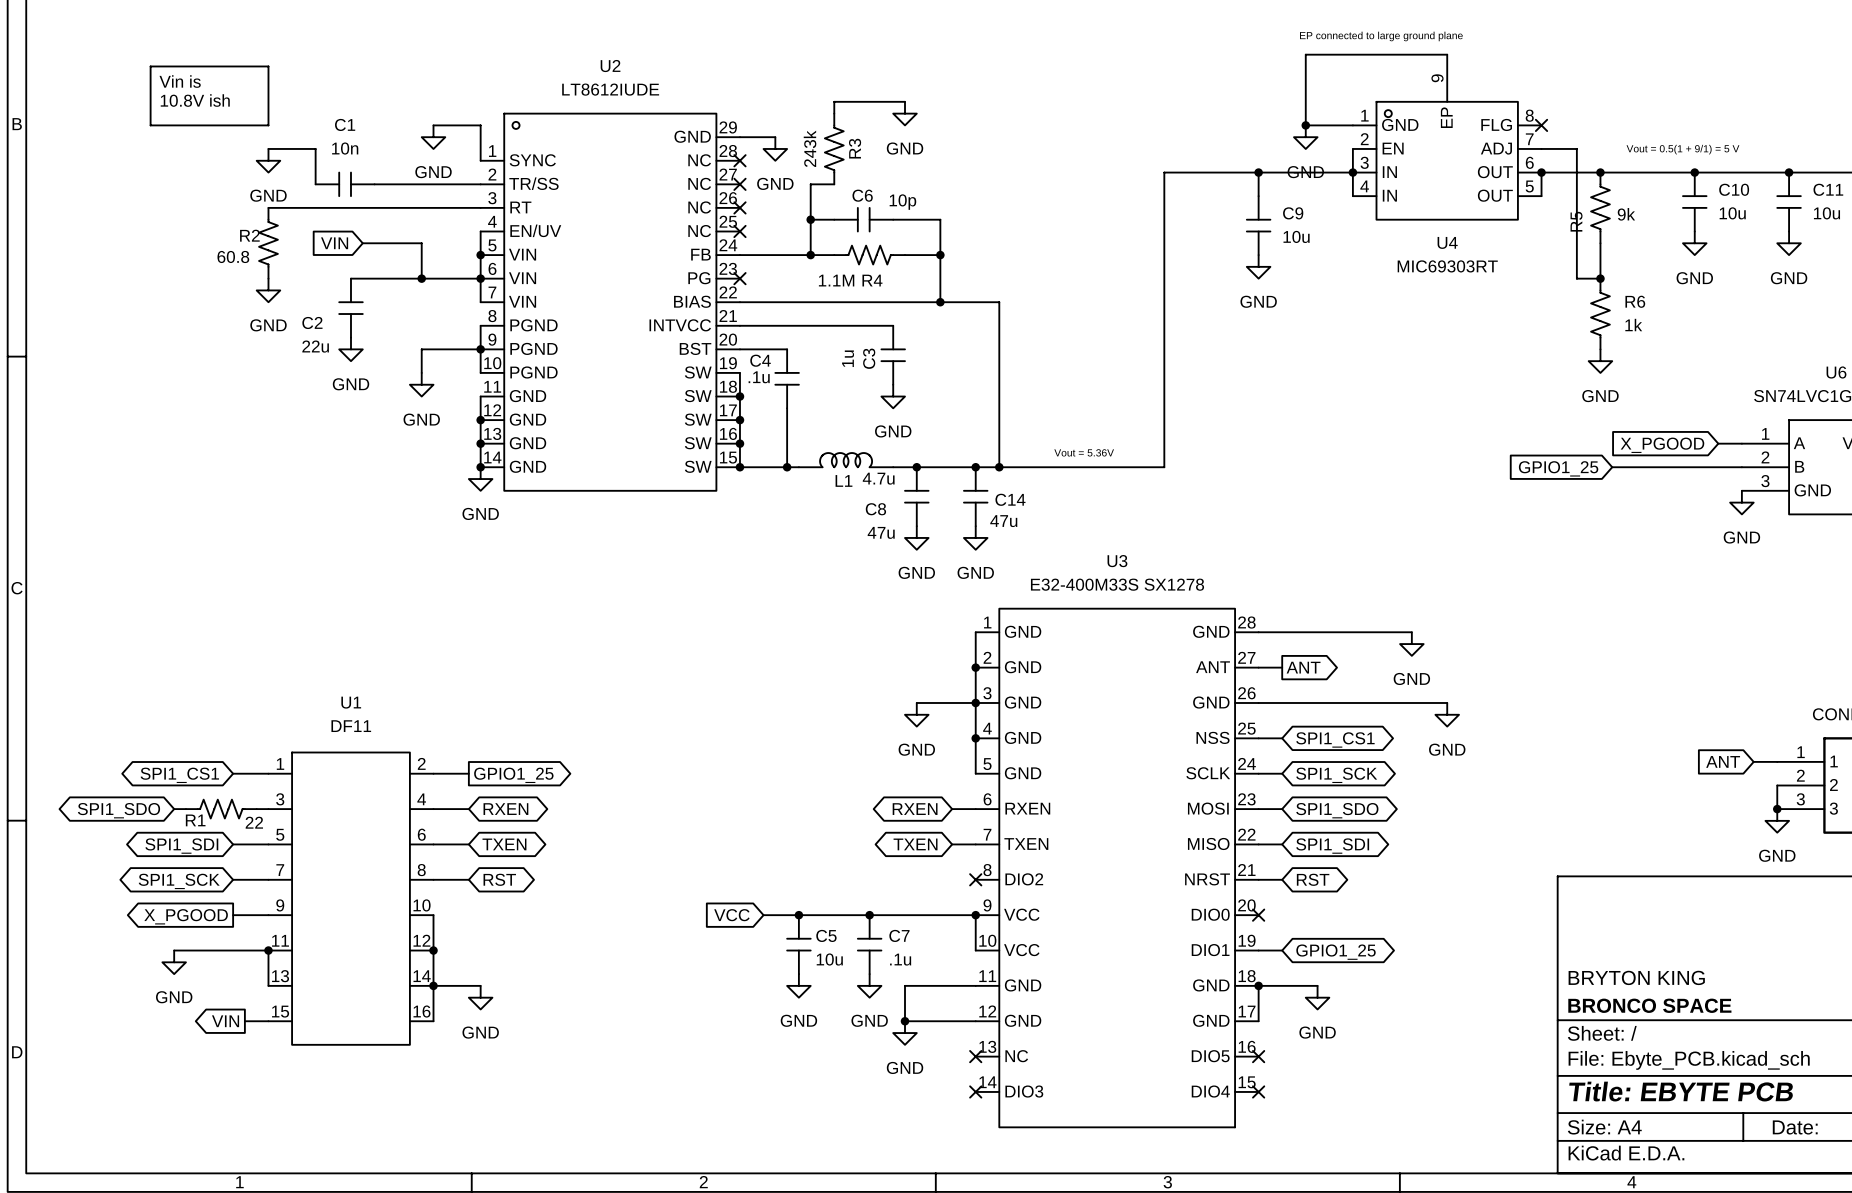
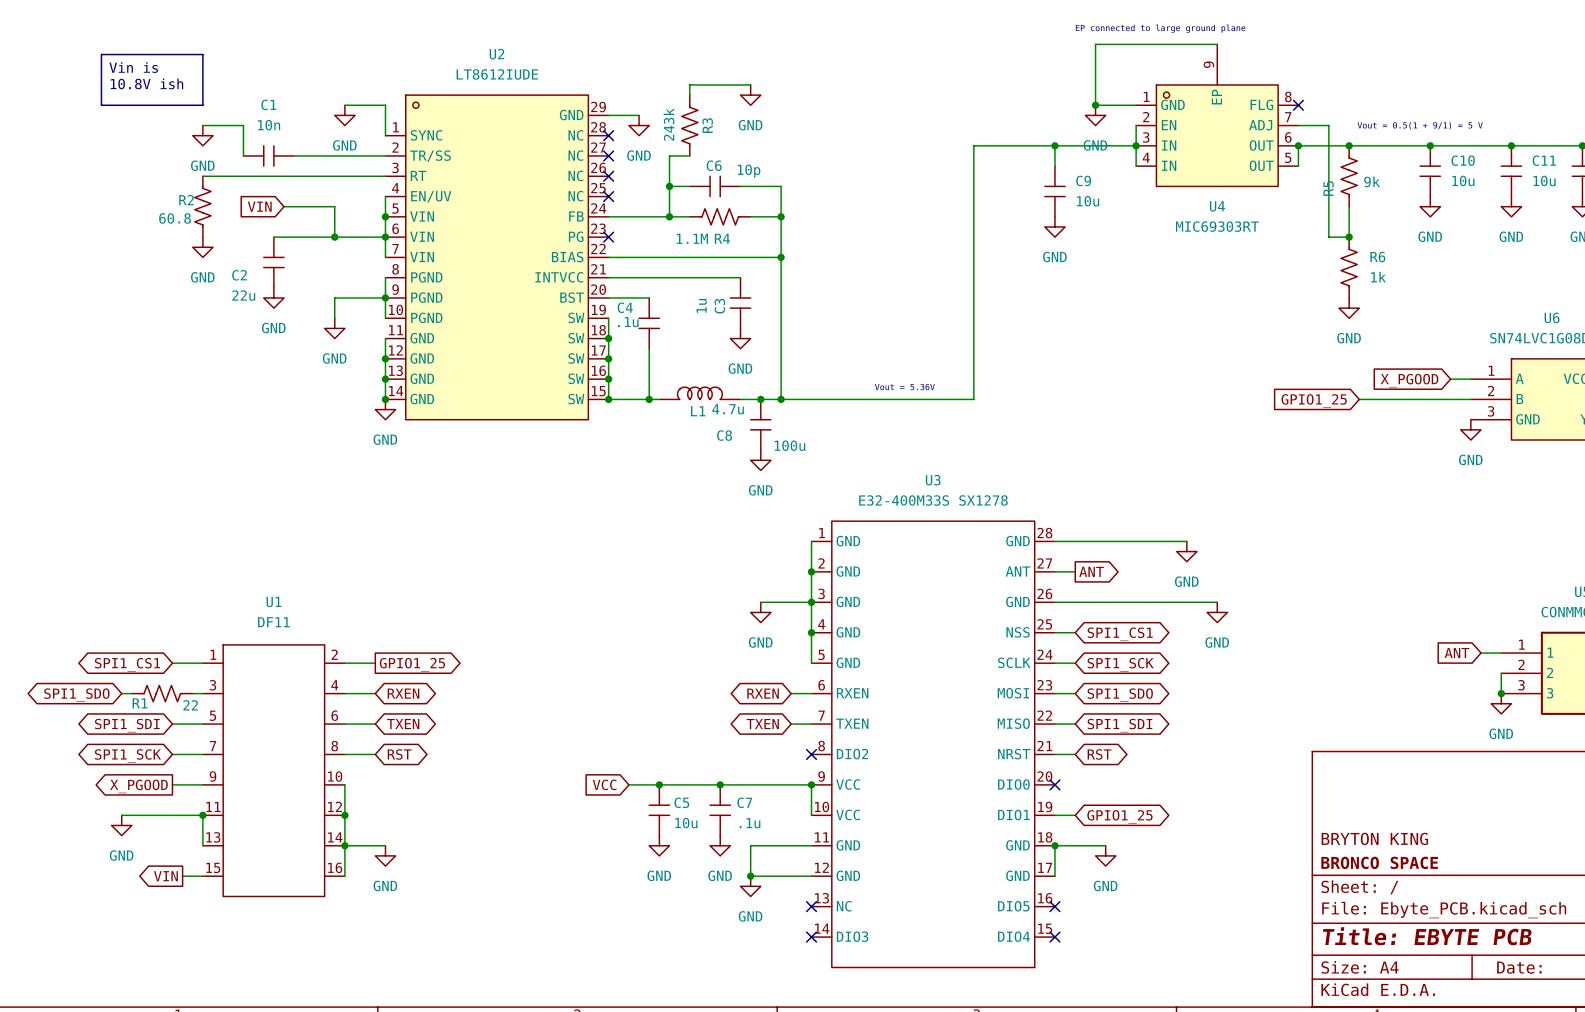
wire: (940, 302) (999, 302) (999, 467) -> (781, 257) (781, 399)
junction: none -> (781, 399)
junction: (975, 467) -> none
junction: (999, 467) -> none
C14: 47u (975, 496) -> none
C8 value: 47u (881, 532) -> 100u (789, 445)
power symbol: GND (975, 537) -> none

